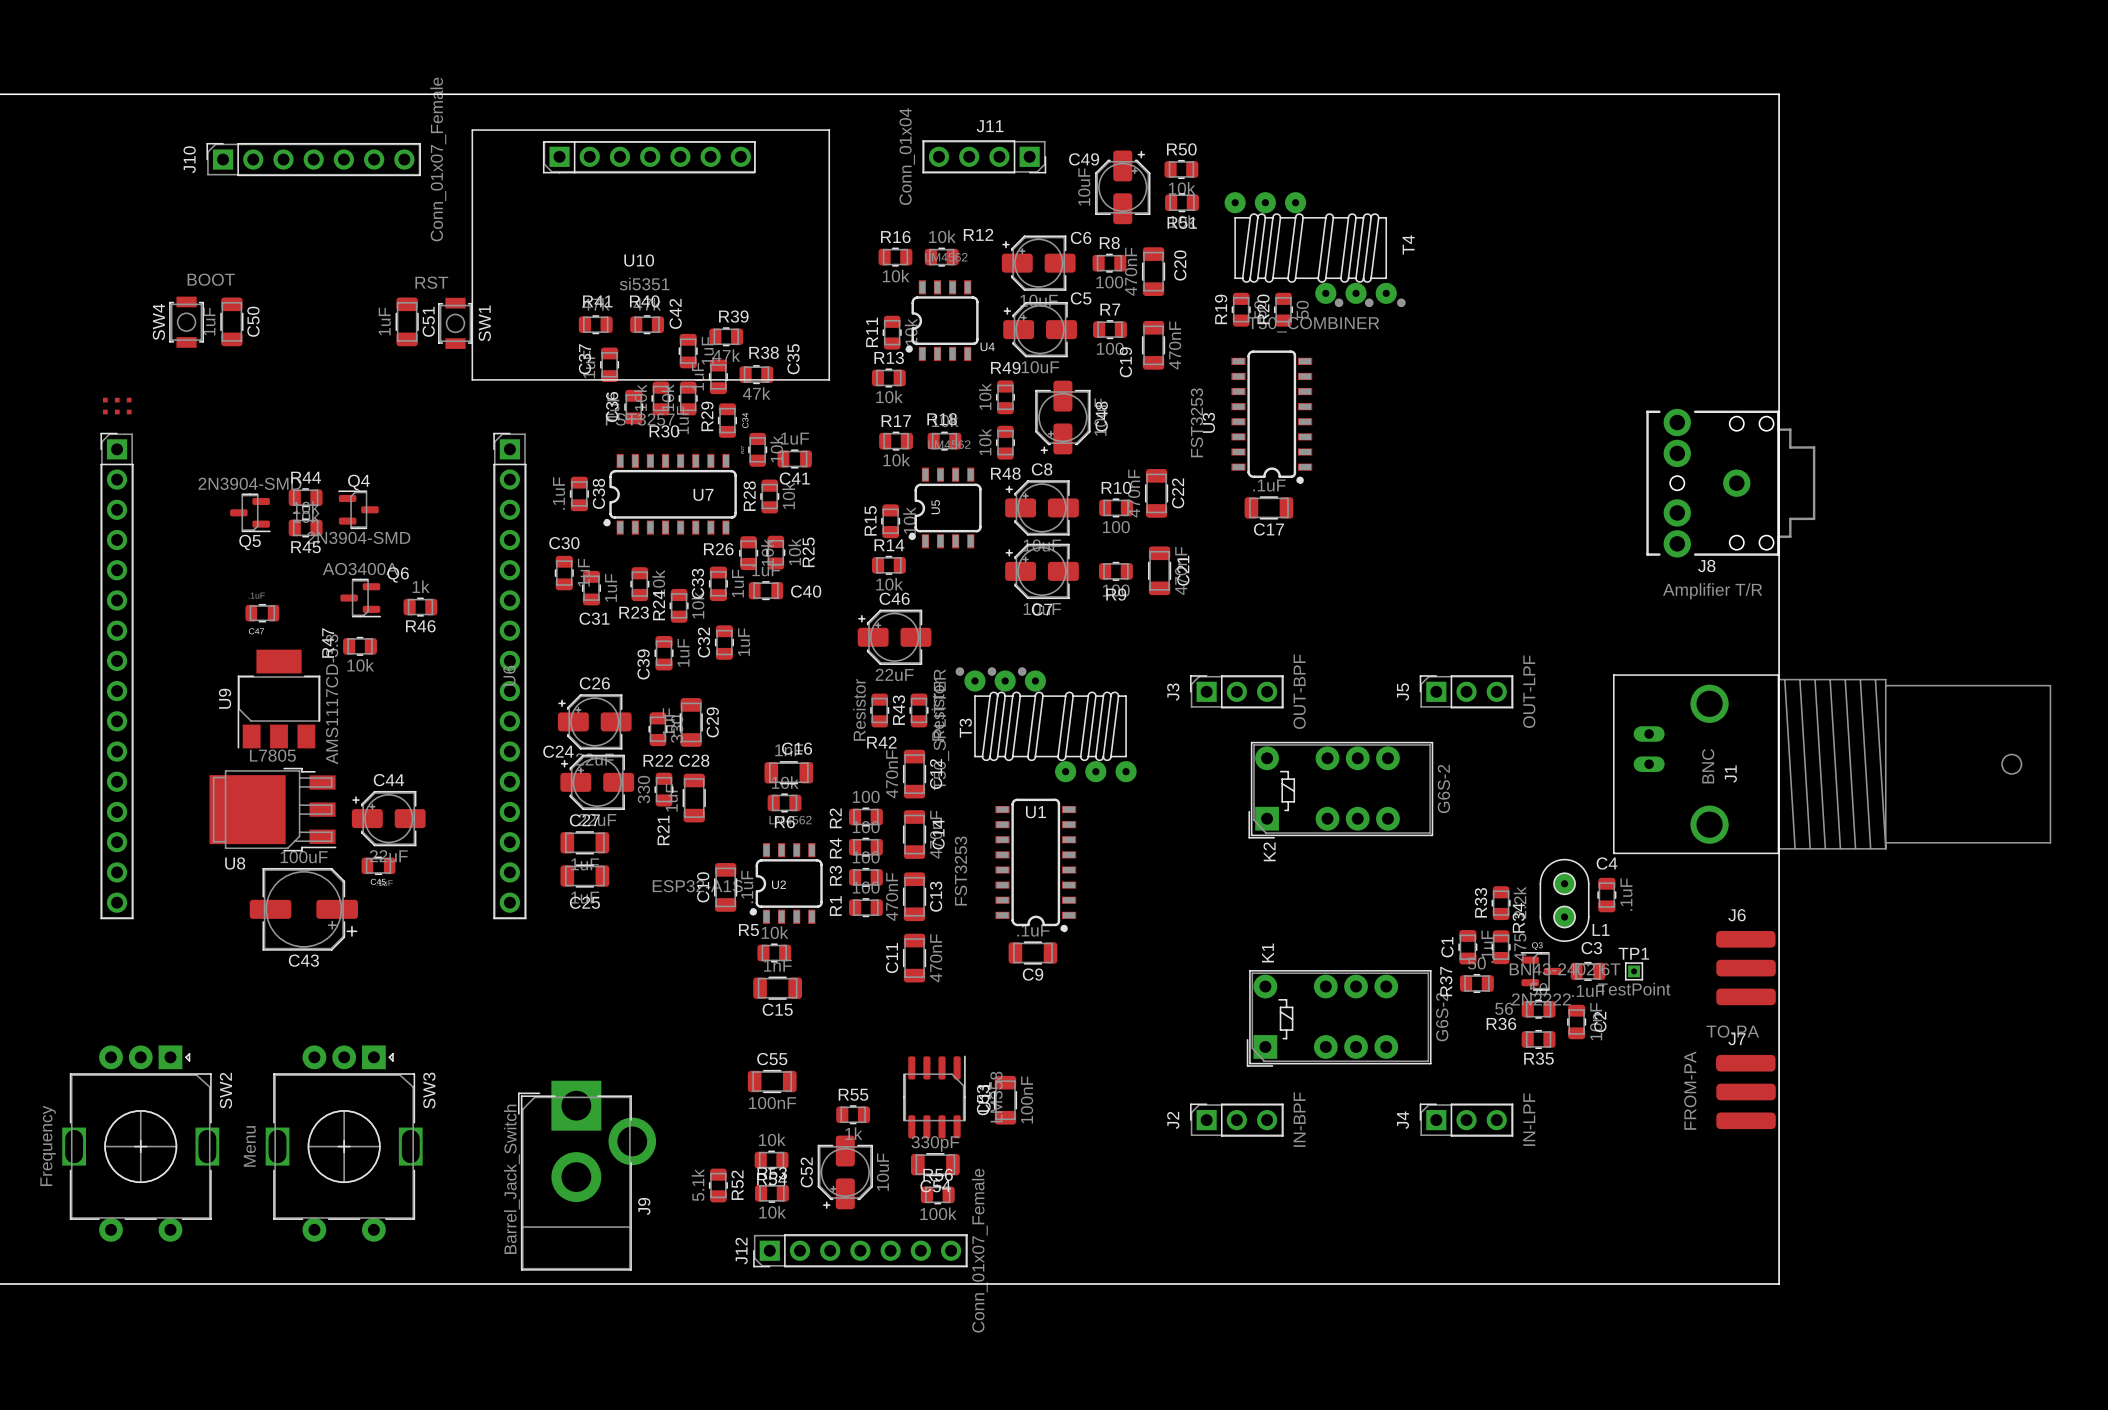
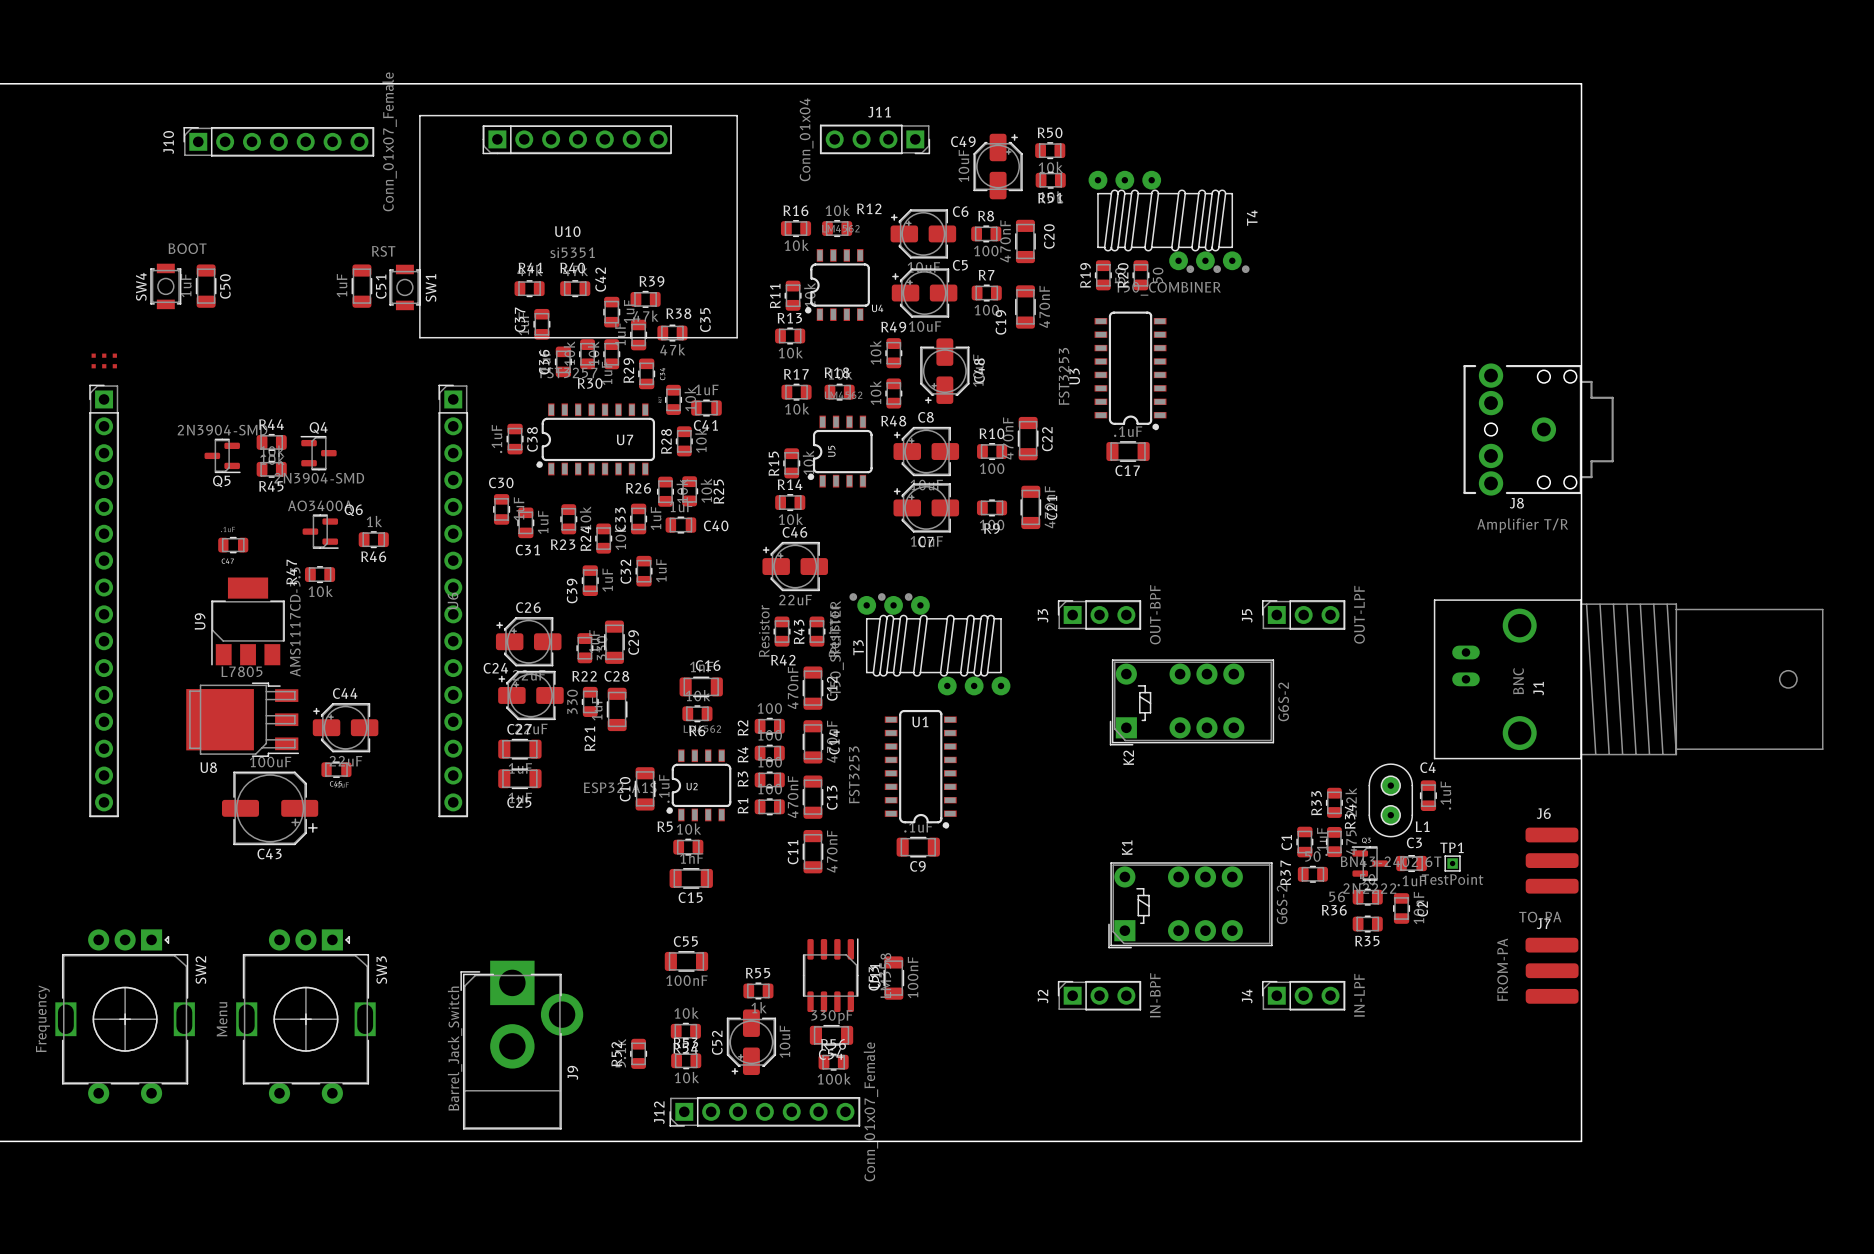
R52 name position: R52 (737, 1185) -> R52 (616, 1054)

